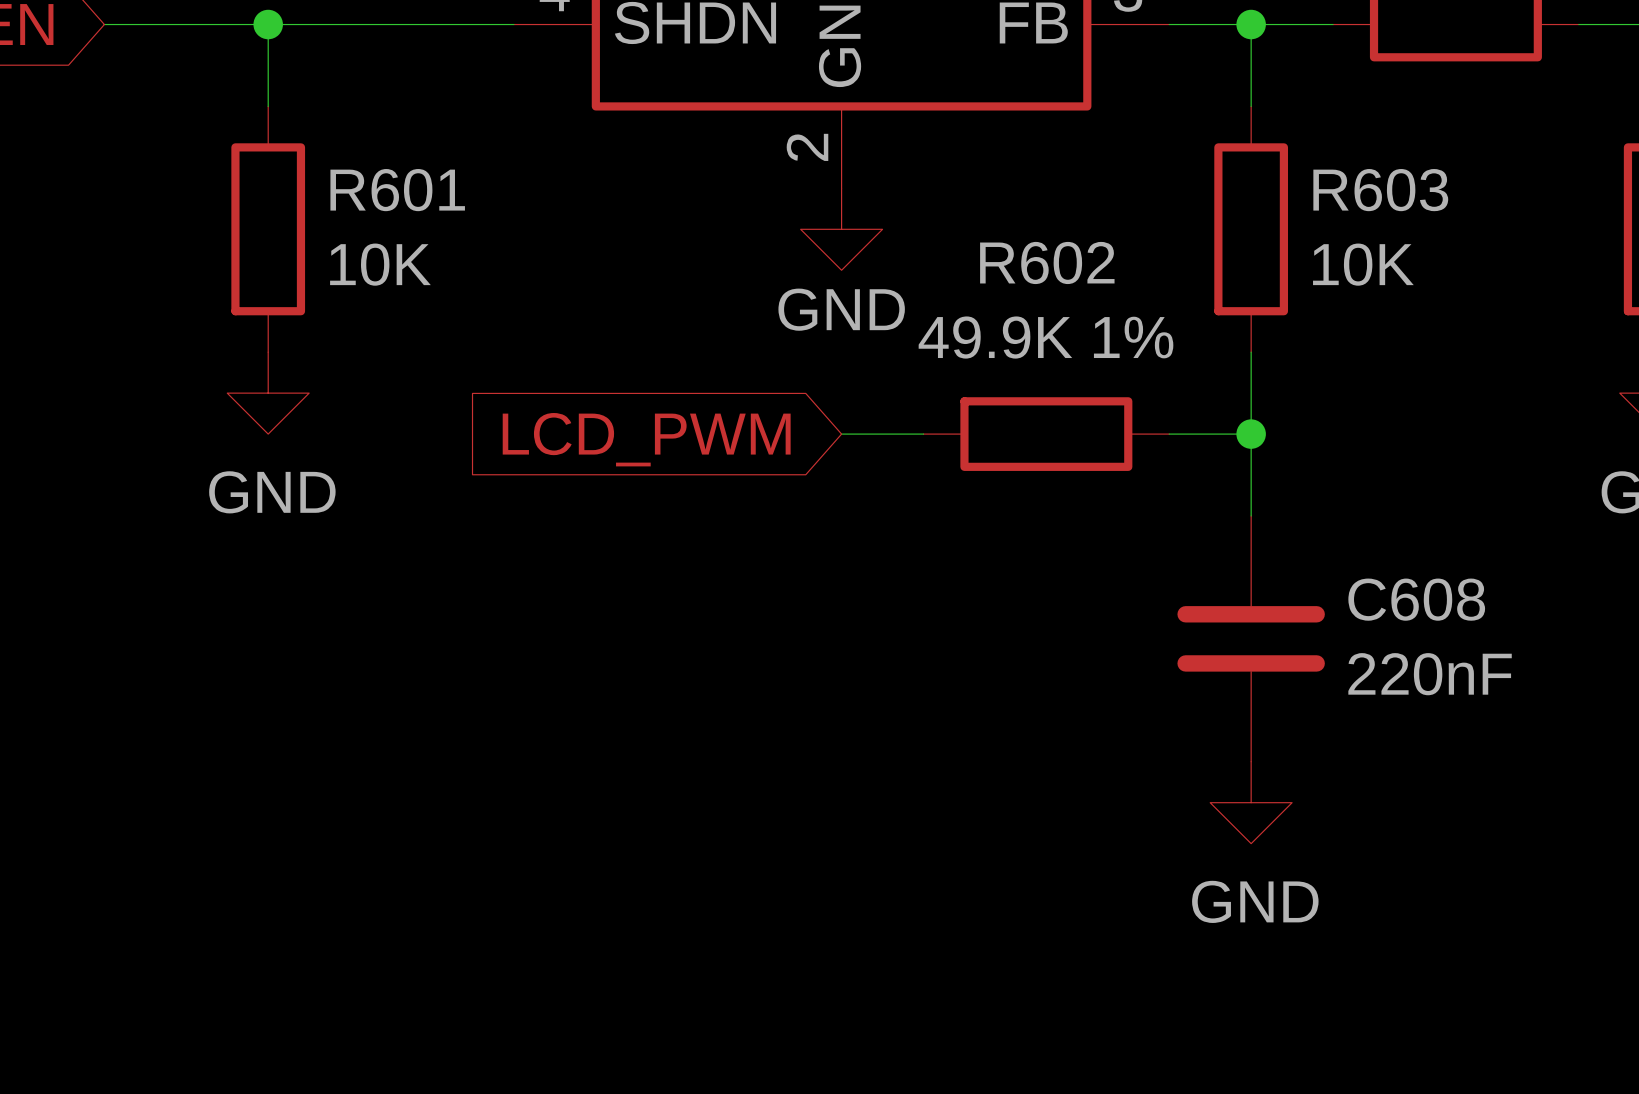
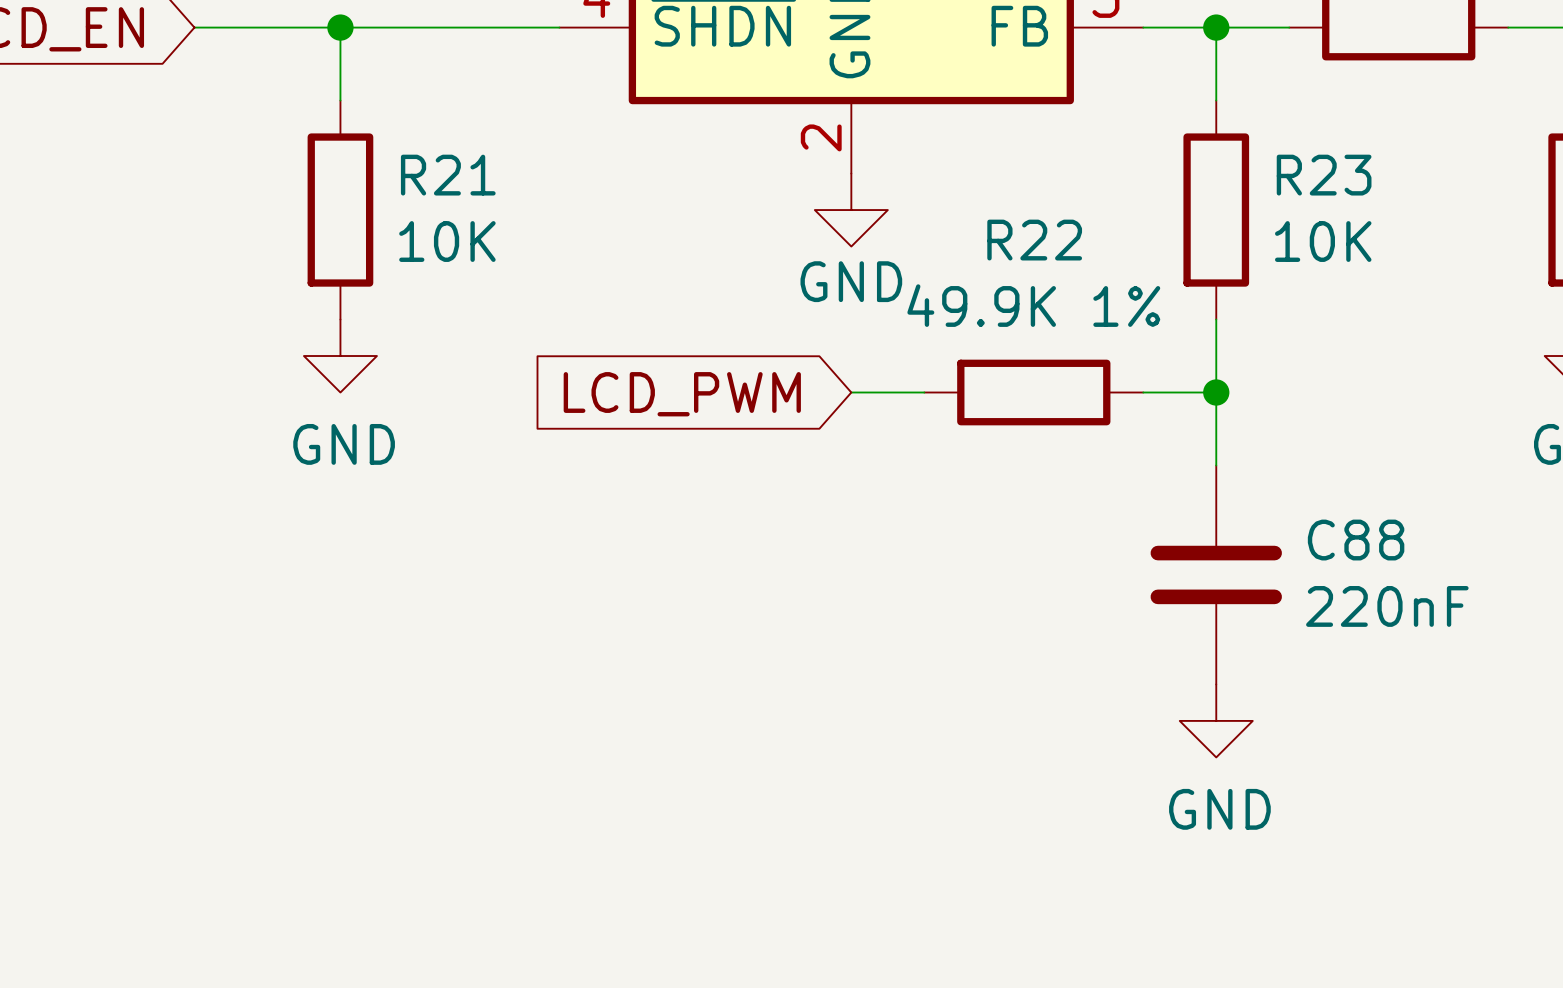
R601 name: R601 (397, 190) -> R21 (448, 175)
R603 name: R603 (1380, 190) -> R23 (1324, 175)
R602 name: R602 (1047, 262) -> R22 (1034, 240)
C608 name: C608 (1416, 599) -> C88 (1356, 540)

